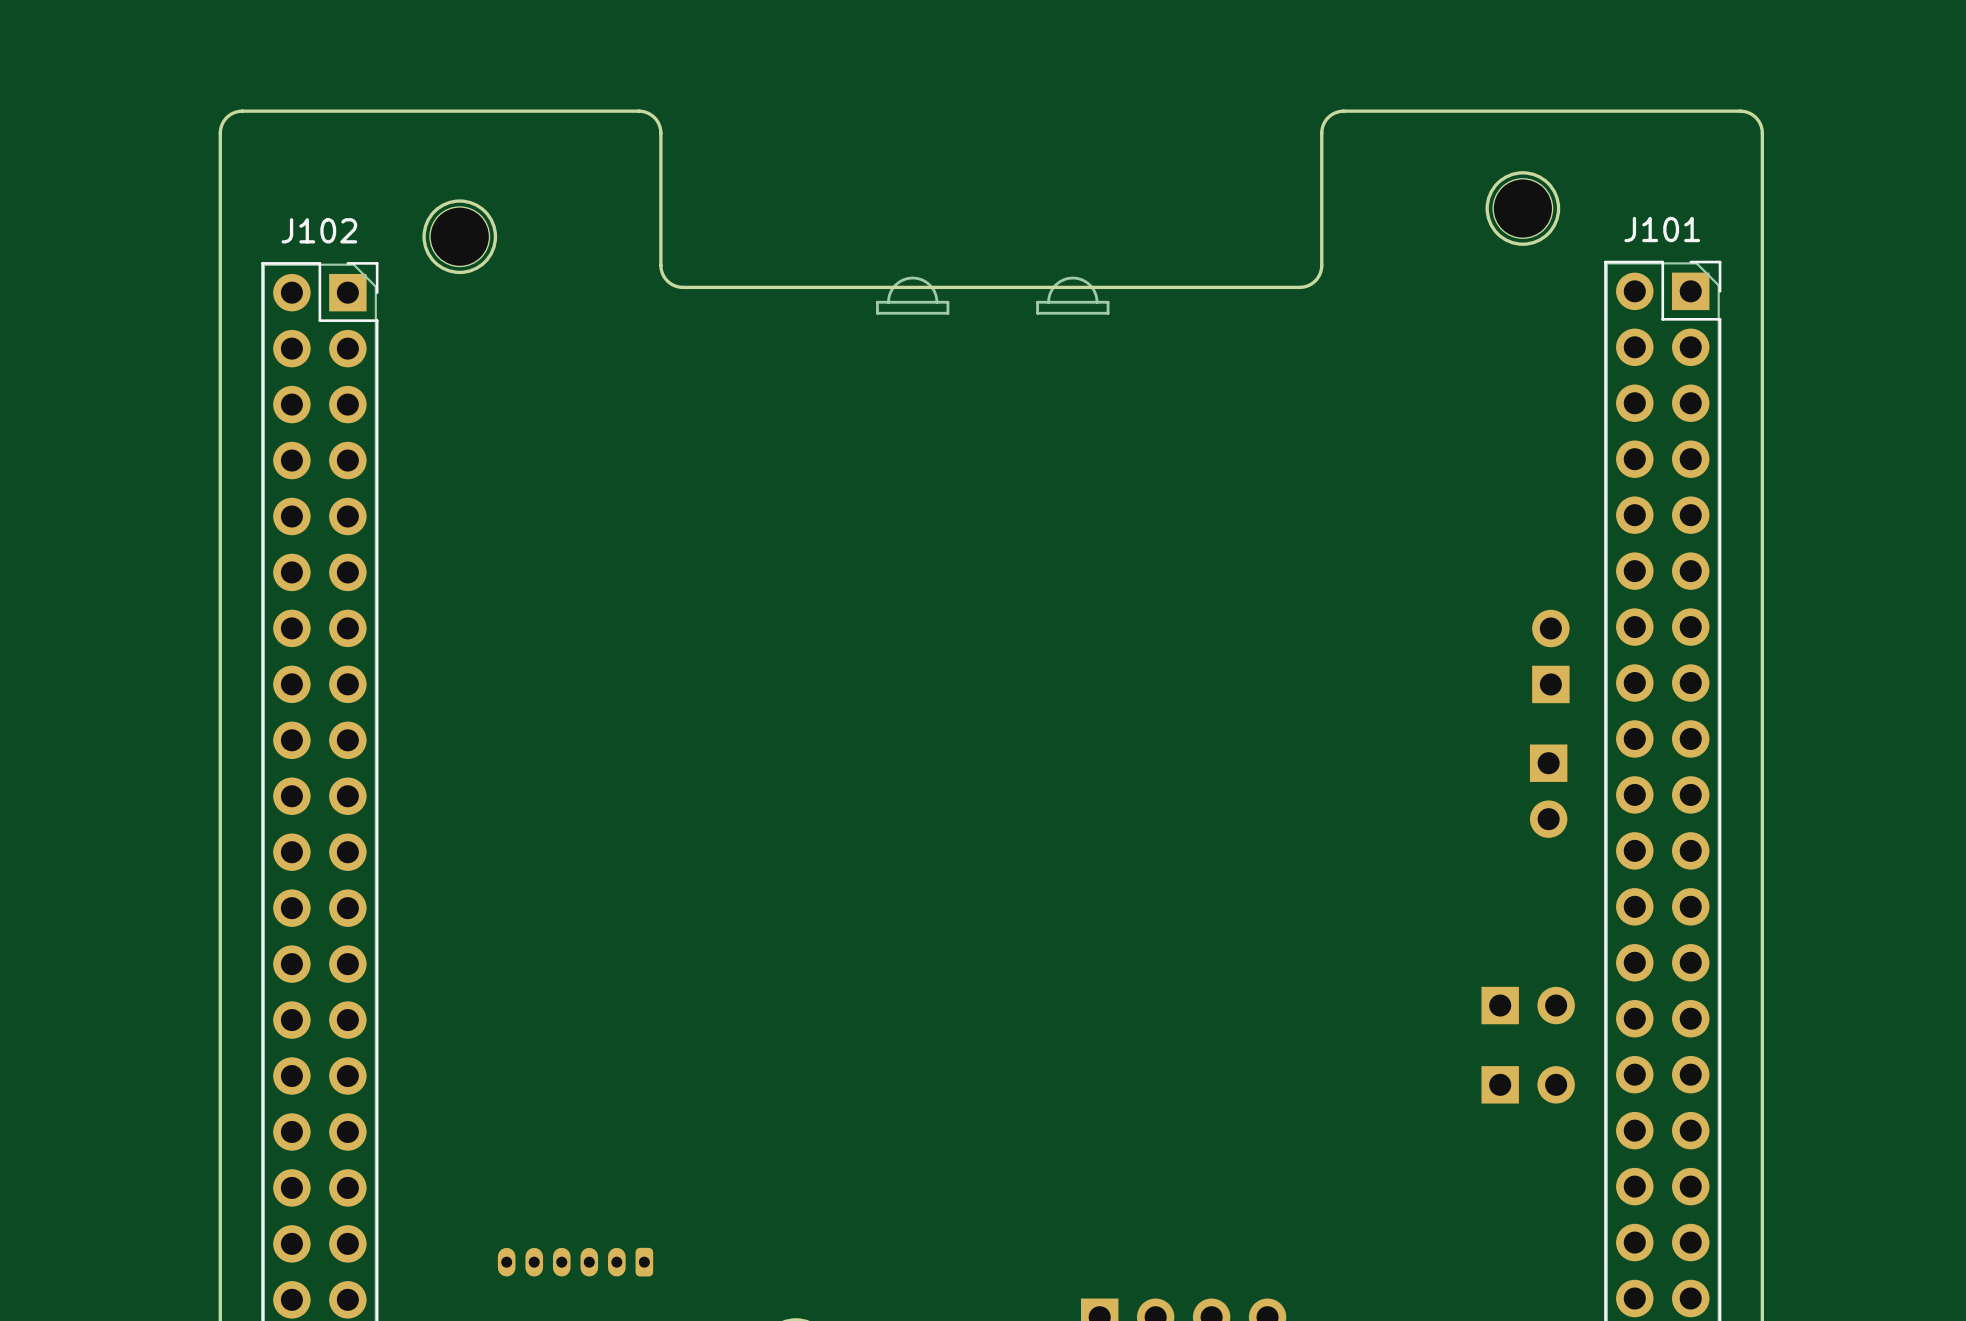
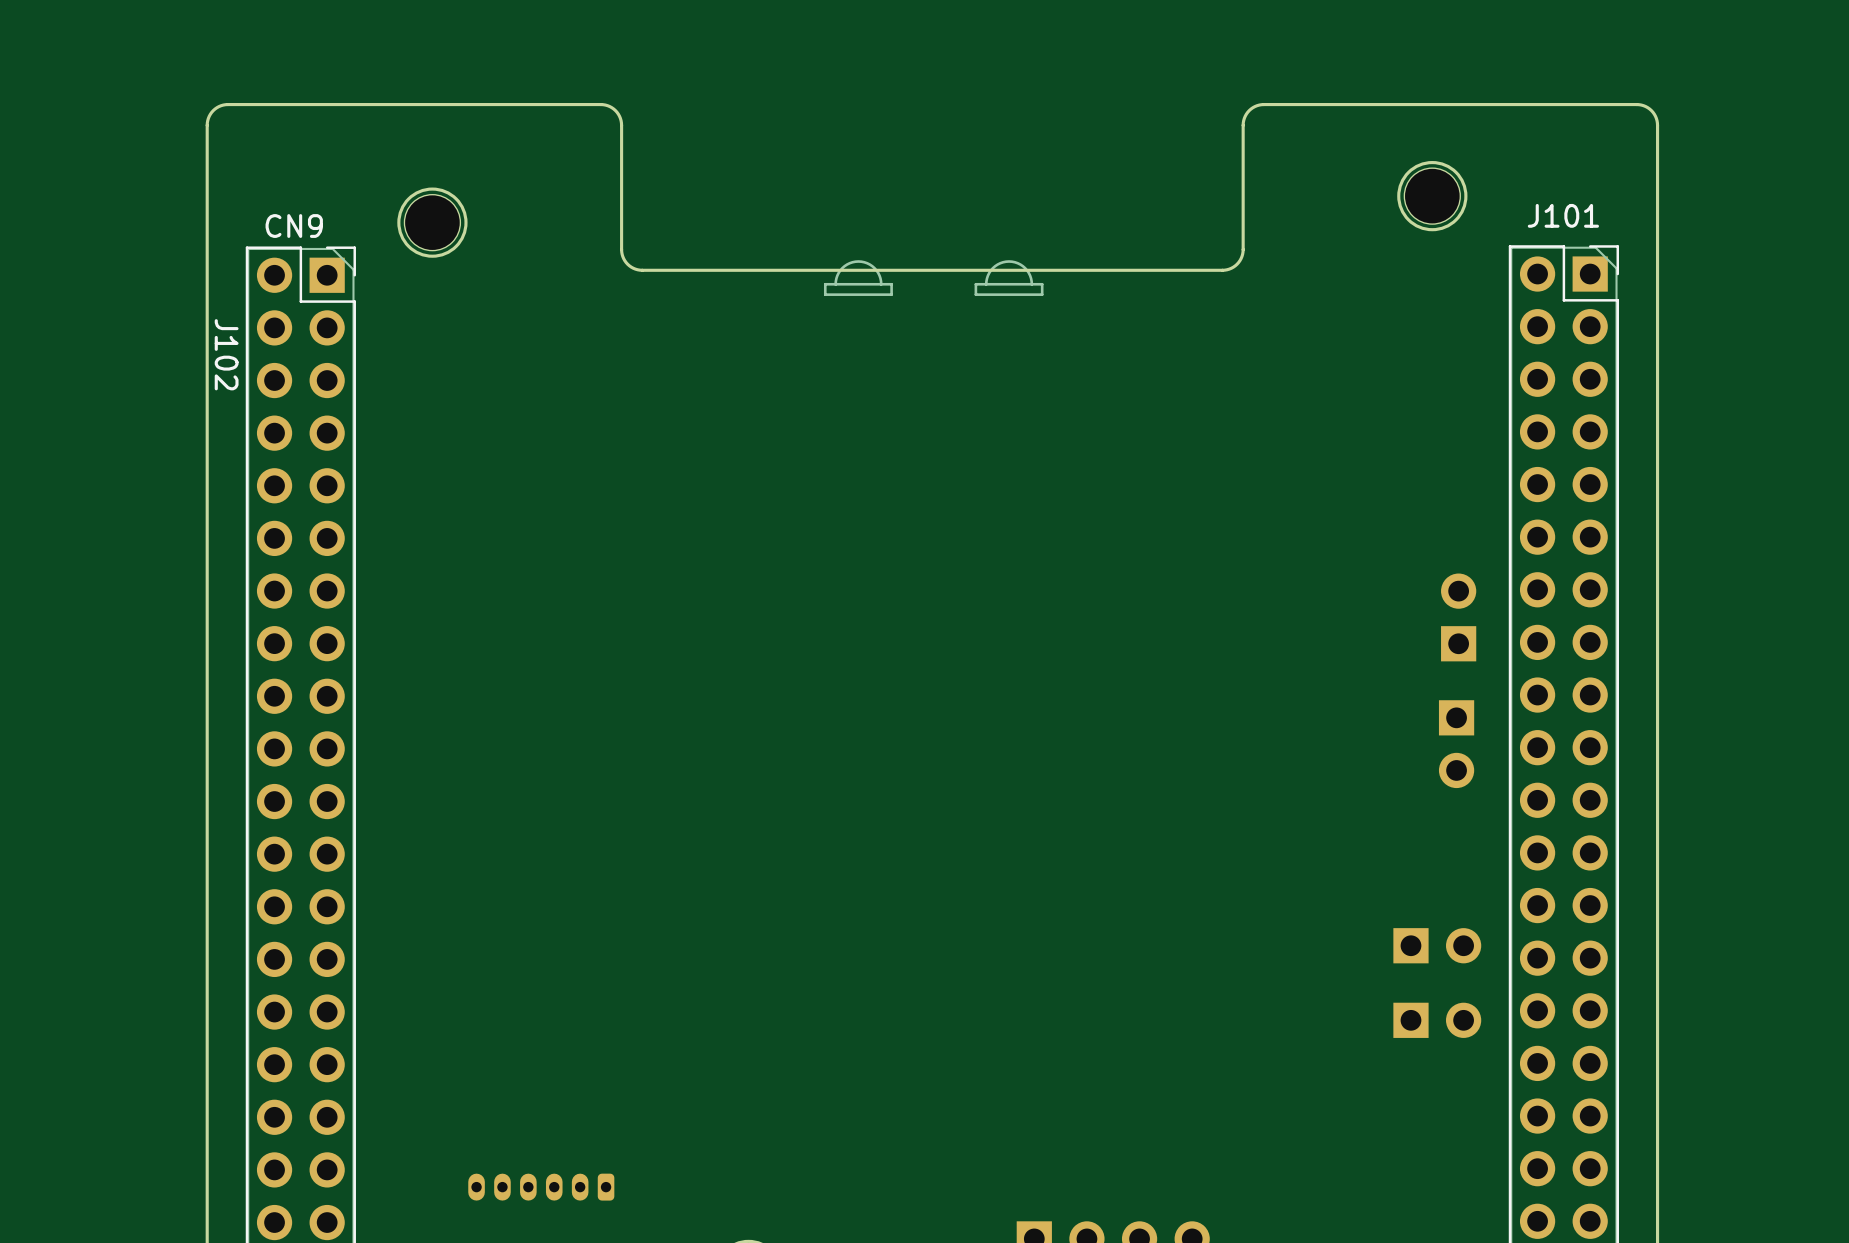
J102 name rotation: 0° (319, 230) -> 90° clockwise (226, 354)
J102 name position: J102 (319, 230) -> J102 (226, 354)
text: none -> CN9 (294, 226)

